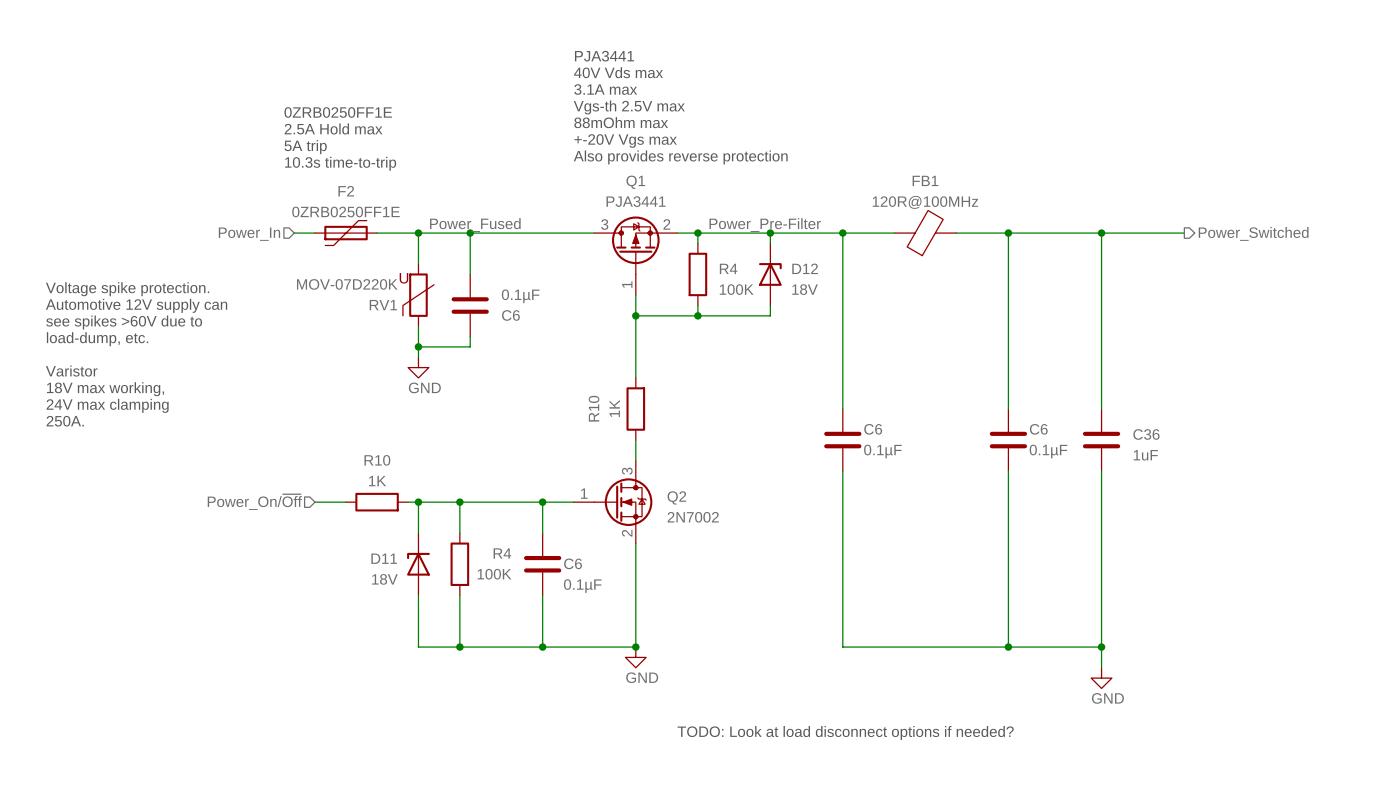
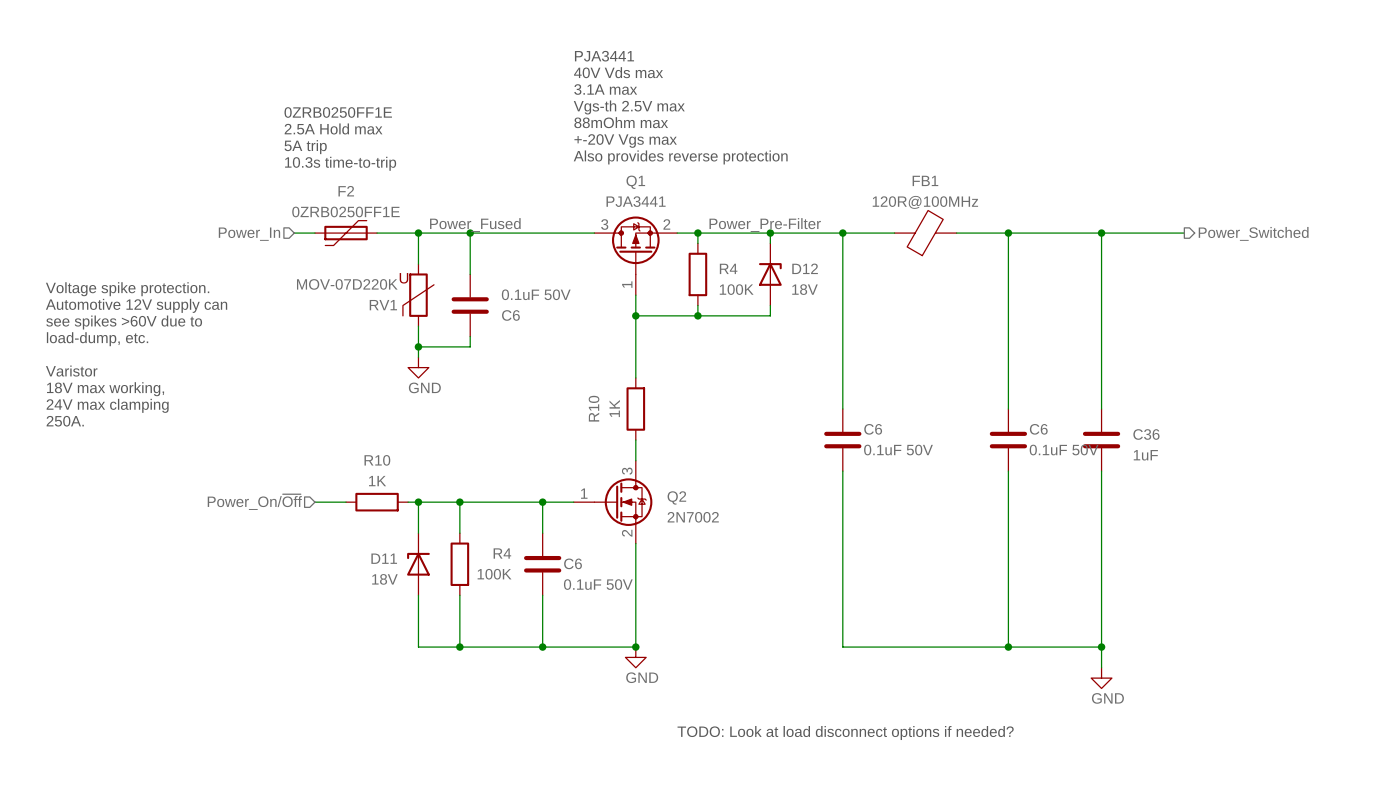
C6 value: 0.1µF (520, 296) -> 0.1uF 50V (536, 294)
C6 value: 0.1µF (882, 451) -> 0.1uF 50V (898, 450)
C6 value: 0.1µF (1048, 451) -> 0.1uF 50V (1064, 450)
C6 value: 0.1µF (582, 586) -> 0.1uF 50V (598, 584)

